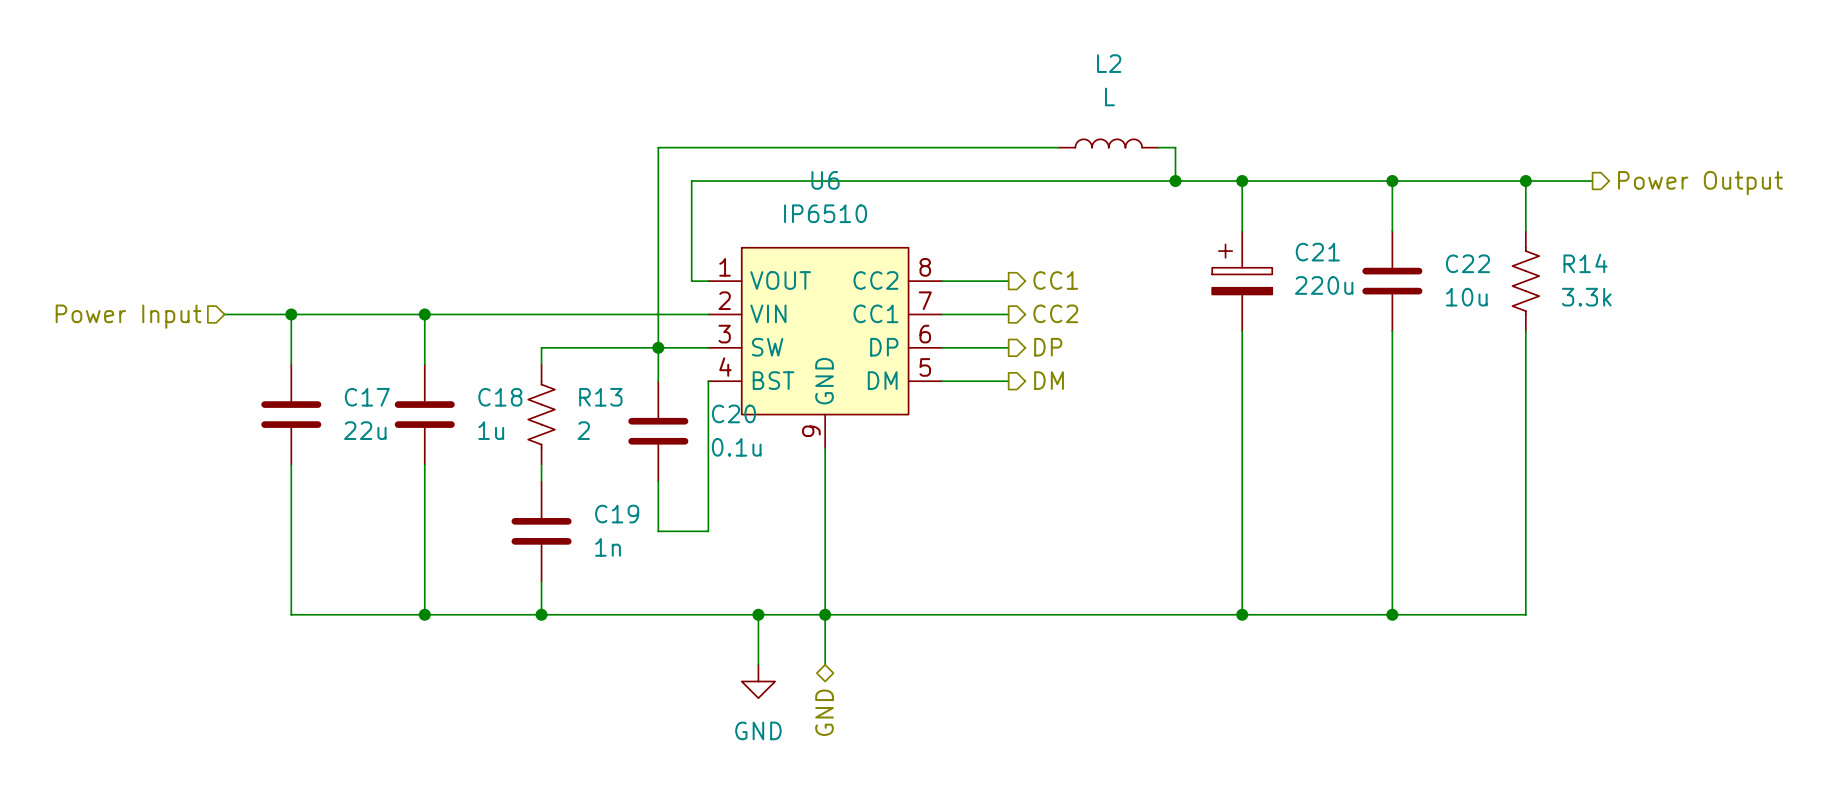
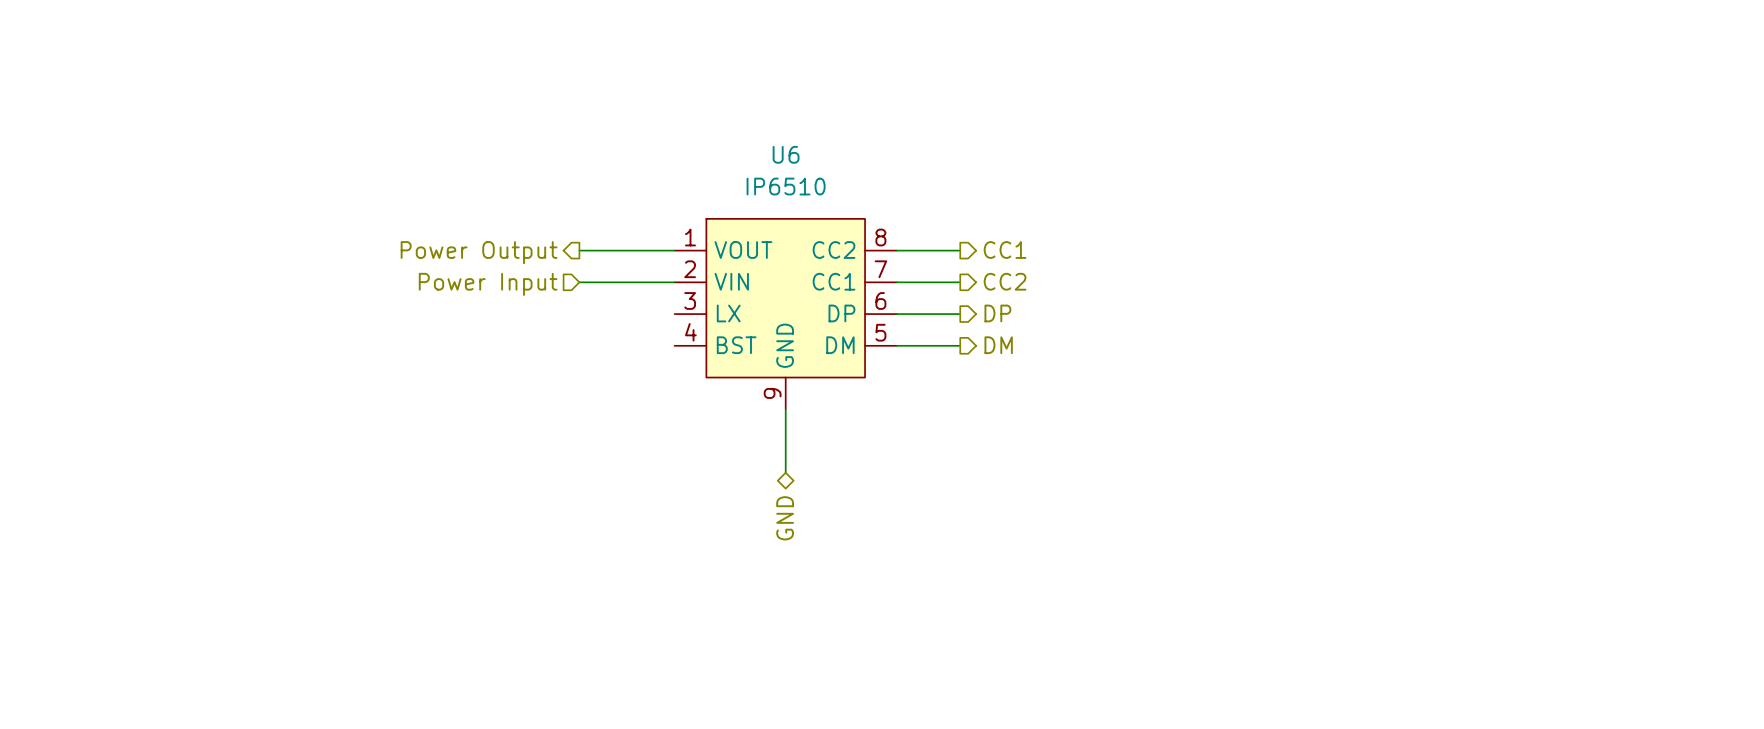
L2: L (1108, 143) -> none
wire: (1058, 147) (658, 147) (658, 381) -> none
wire: (1158, 147) (1175, 147) (1175, 181) -> none
junction: (1175, 181) -> none
wire: (1242, 181) (1242, 231) -> none
junction: (1242, 181) -> none
wire: (1392, 181) (1392, 231) -> none
junction: (1392, 181) -> none
wire: (1525, 181) (1525, 231) -> none
junction: (1525, 181) -> none
wire: (1592, 181) (691, 181) (691, 281) -> (579, 250) (658, 250)
hierarchical label: Power Output (1700, 183) -> none
C21: 220u (1242, 281) -> none
C22: 10u (1392, 281) -> none
R14: 3.3k (1525, 281) -> none
hierarchical label: none -> Power Output (479, 252)
wire: (224, 314) (608, 314) -> none
wire: (291, 314) (291, 364) -> none
junction: (291, 314) -> none
wire: (424, 314) (424, 364) -> none
junction: (424, 314) -> none
hierarchical label: Power Input (128, 316) -> none
hierarchical label: none -> Power Input (488, 284)
wire: (1242, 331) (1242, 614) -> none
wire: (1392, 331) (1392, 614) -> none
wire: (1525, 331) (1525, 614) (291, 614) (291, 464) -> none
junction: (658, 347) -> none
wire: (708, 347) (541, 347) (541, 364) -> none
U6 pin name: SW (767, 347) -> LX (728, 313)
wire: (708, 381) (708, 531) (658, 531) (658, 481) -> none
C17: 22u (291, 414) -> none
C18: 1u (424, 414) -> none
R13: 2 (541, 414) -> none
C20: 0.1u (658, 431) -> none
wire: (424, 464) (424, 614) -> none
wire: (541, 464) (541, 481) -> none
wire: (825, 514) (825, 664) -> none
C19: 1n (541, 531) -> none
wire: (541, 581) (541, 614) -> none
junction: (424, 614) -> none
junction: (541, 614) -> none
wire: (758, 614) (758, 664) -> none
junction: (758, 614) -> none
junction: (825, 614) -> none
junction: (1242, 614) -> none
junction: (1392, 614) -> none
power symbol: GND (758, 681) -> none
hierarchical label position: GND (824, 712) -> GND (785, 518)

